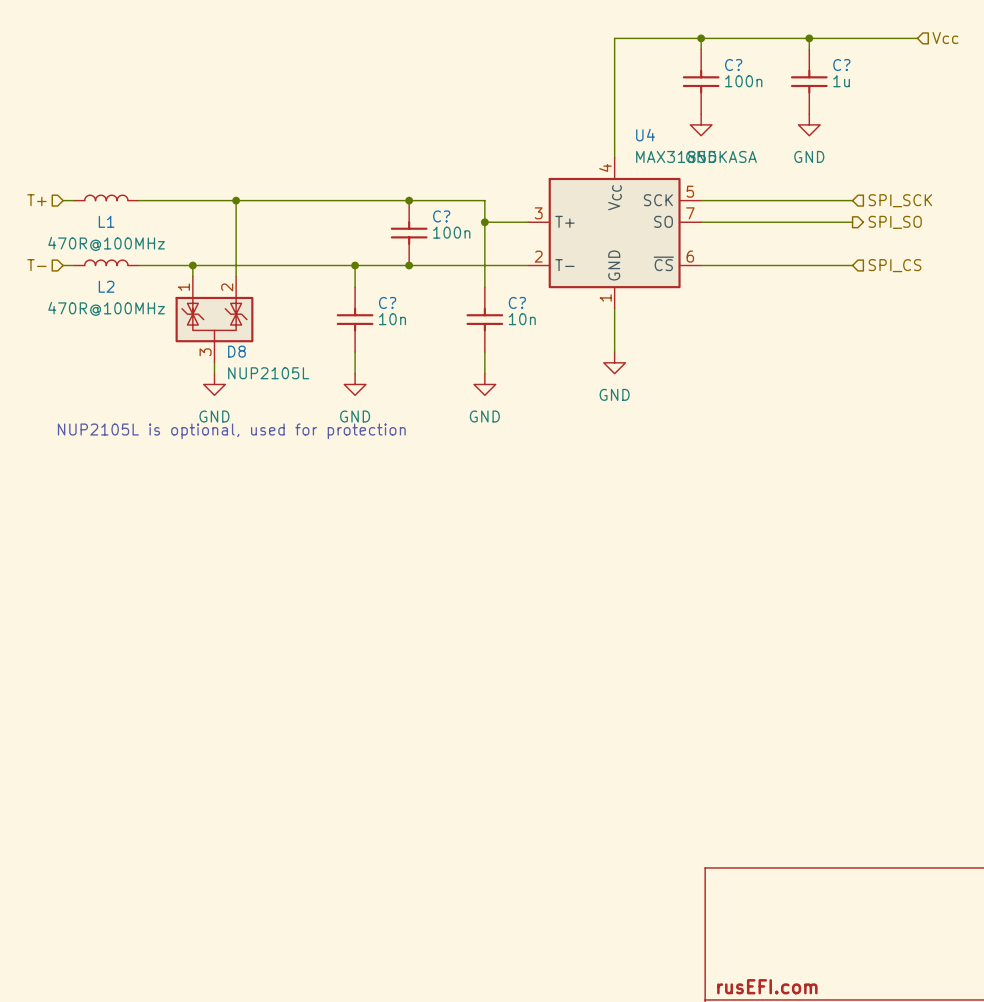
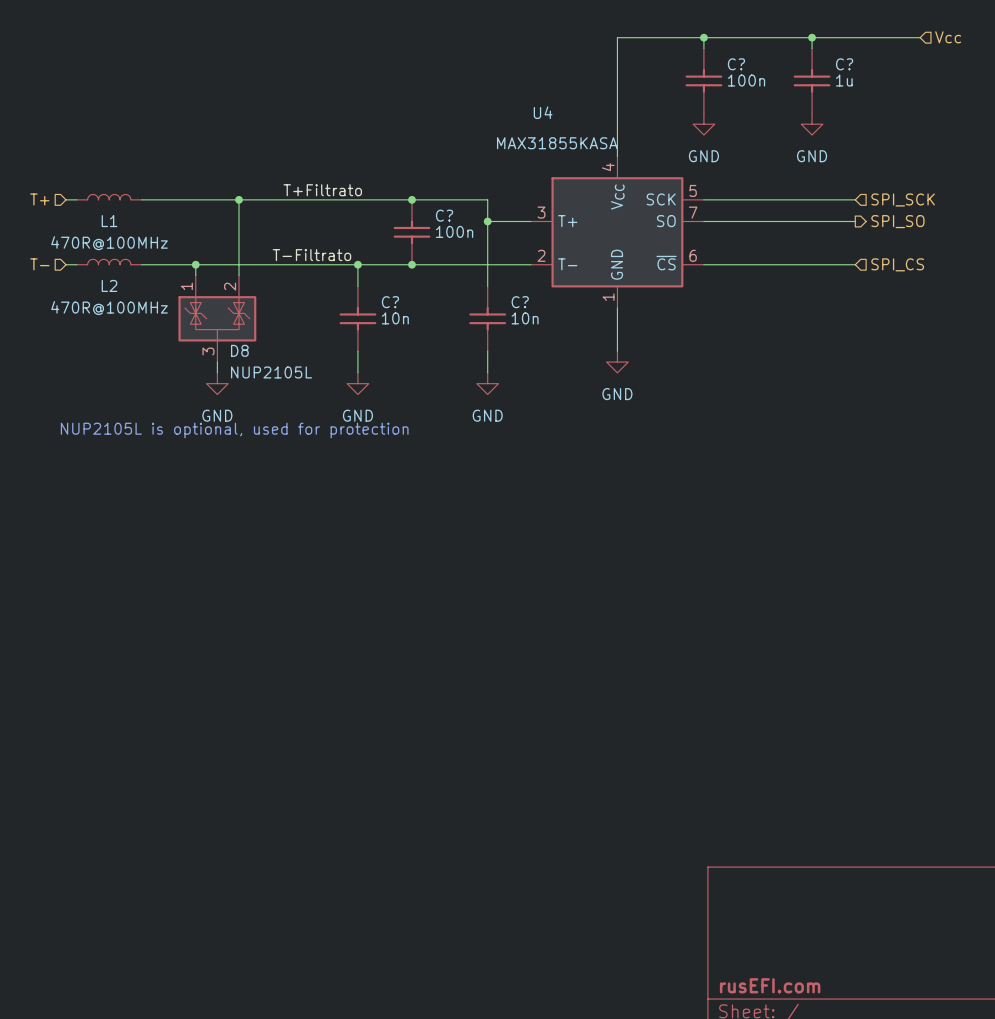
U4 name position: U4 (645, 135) -> U4 (543, 112)
U4 value position: MAX31855KASA (696, 156) -> MAX31855KASA (557, 143)
label: none -> T+Filtrato (322, 190)
label: none -> T-Filtrato (311, 255)

